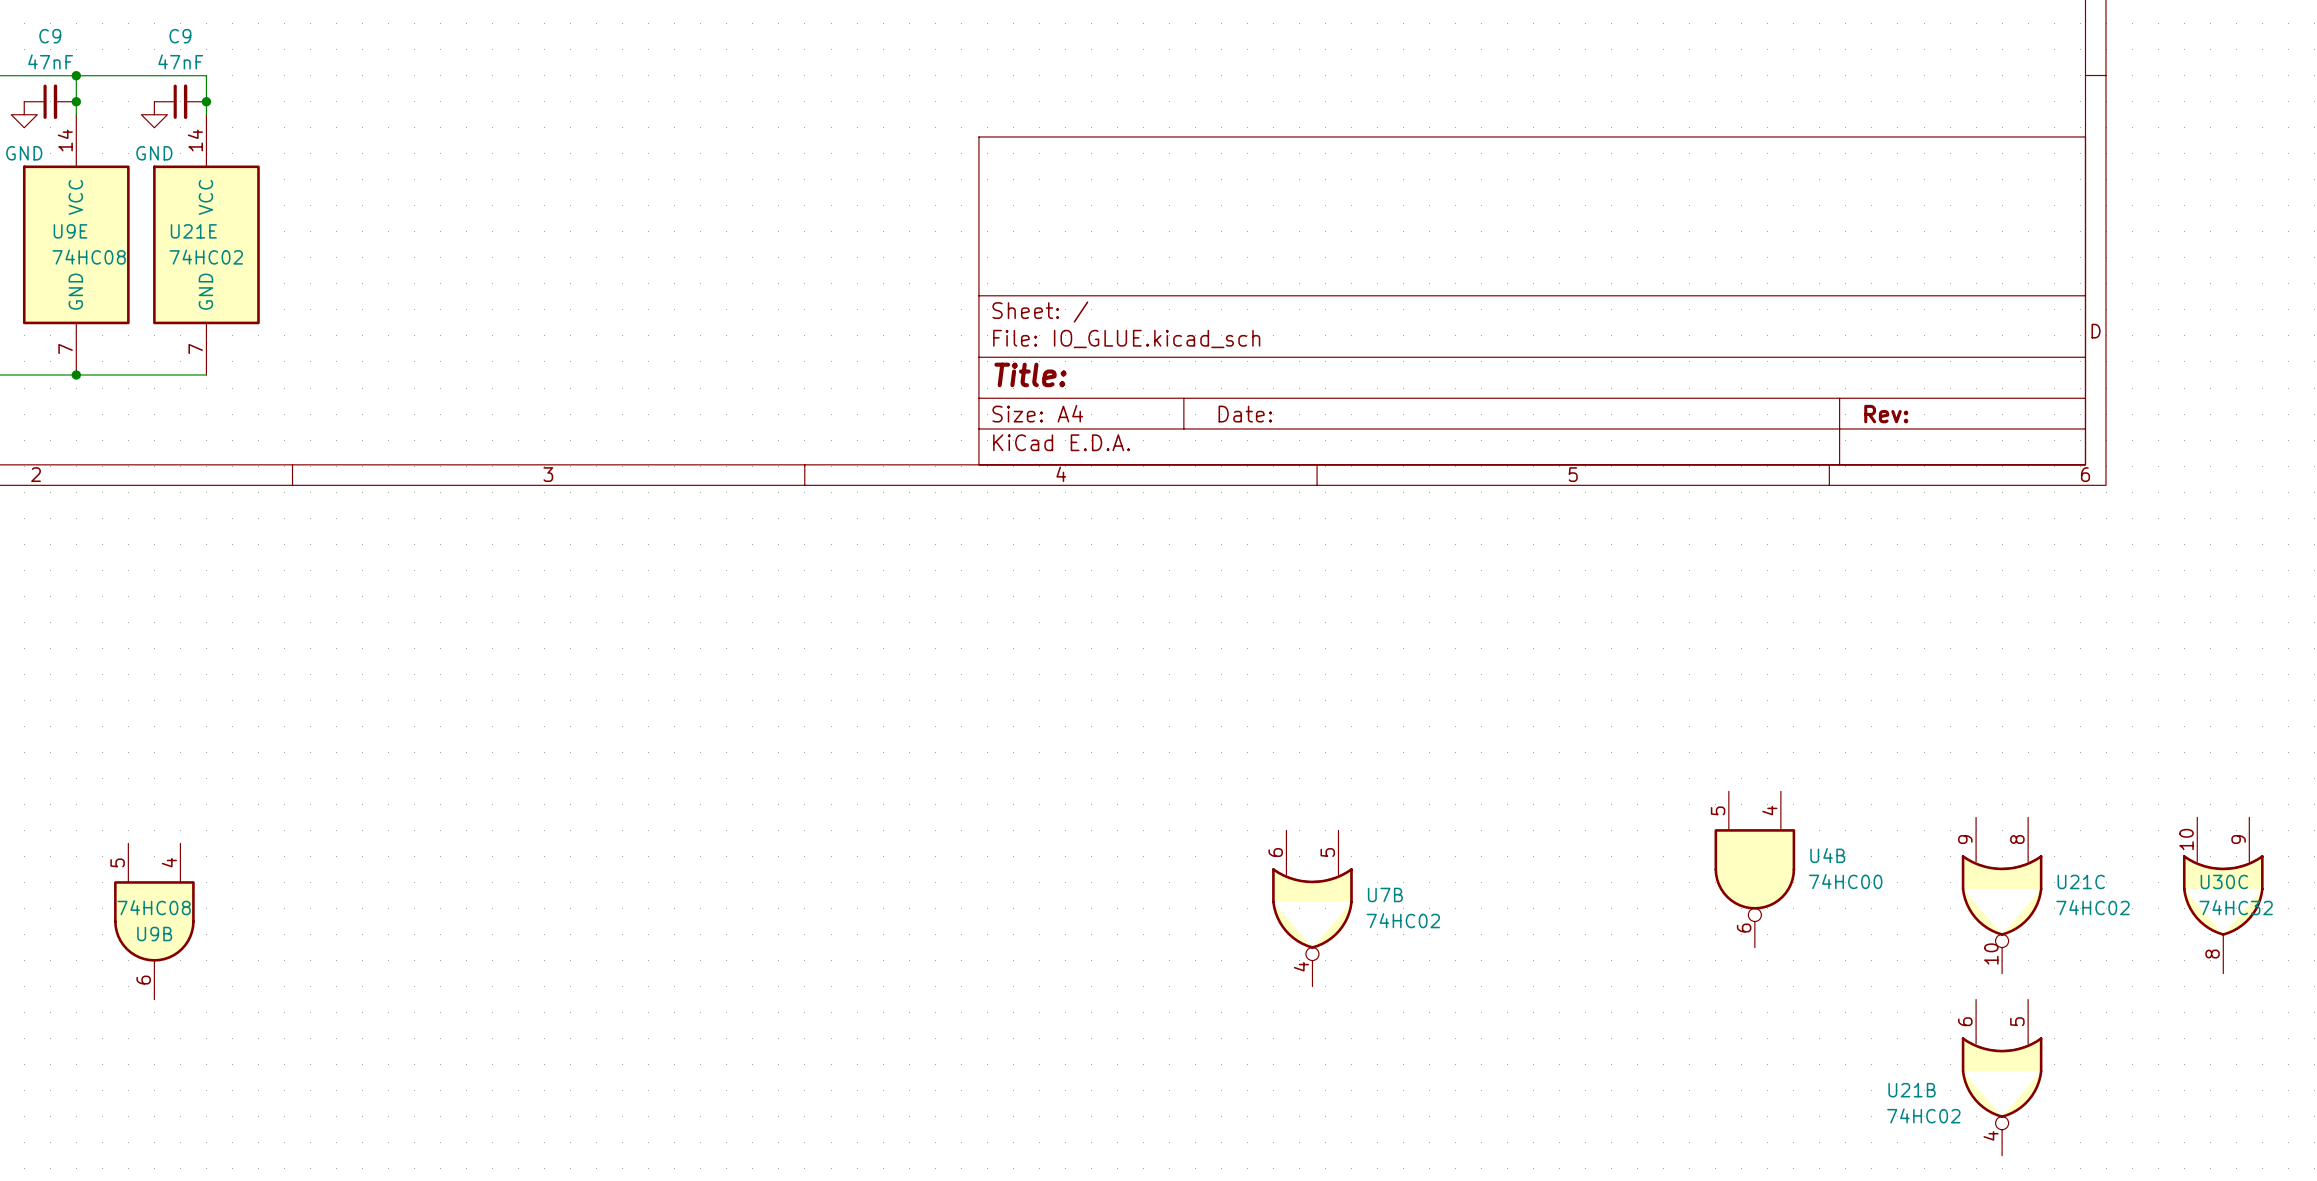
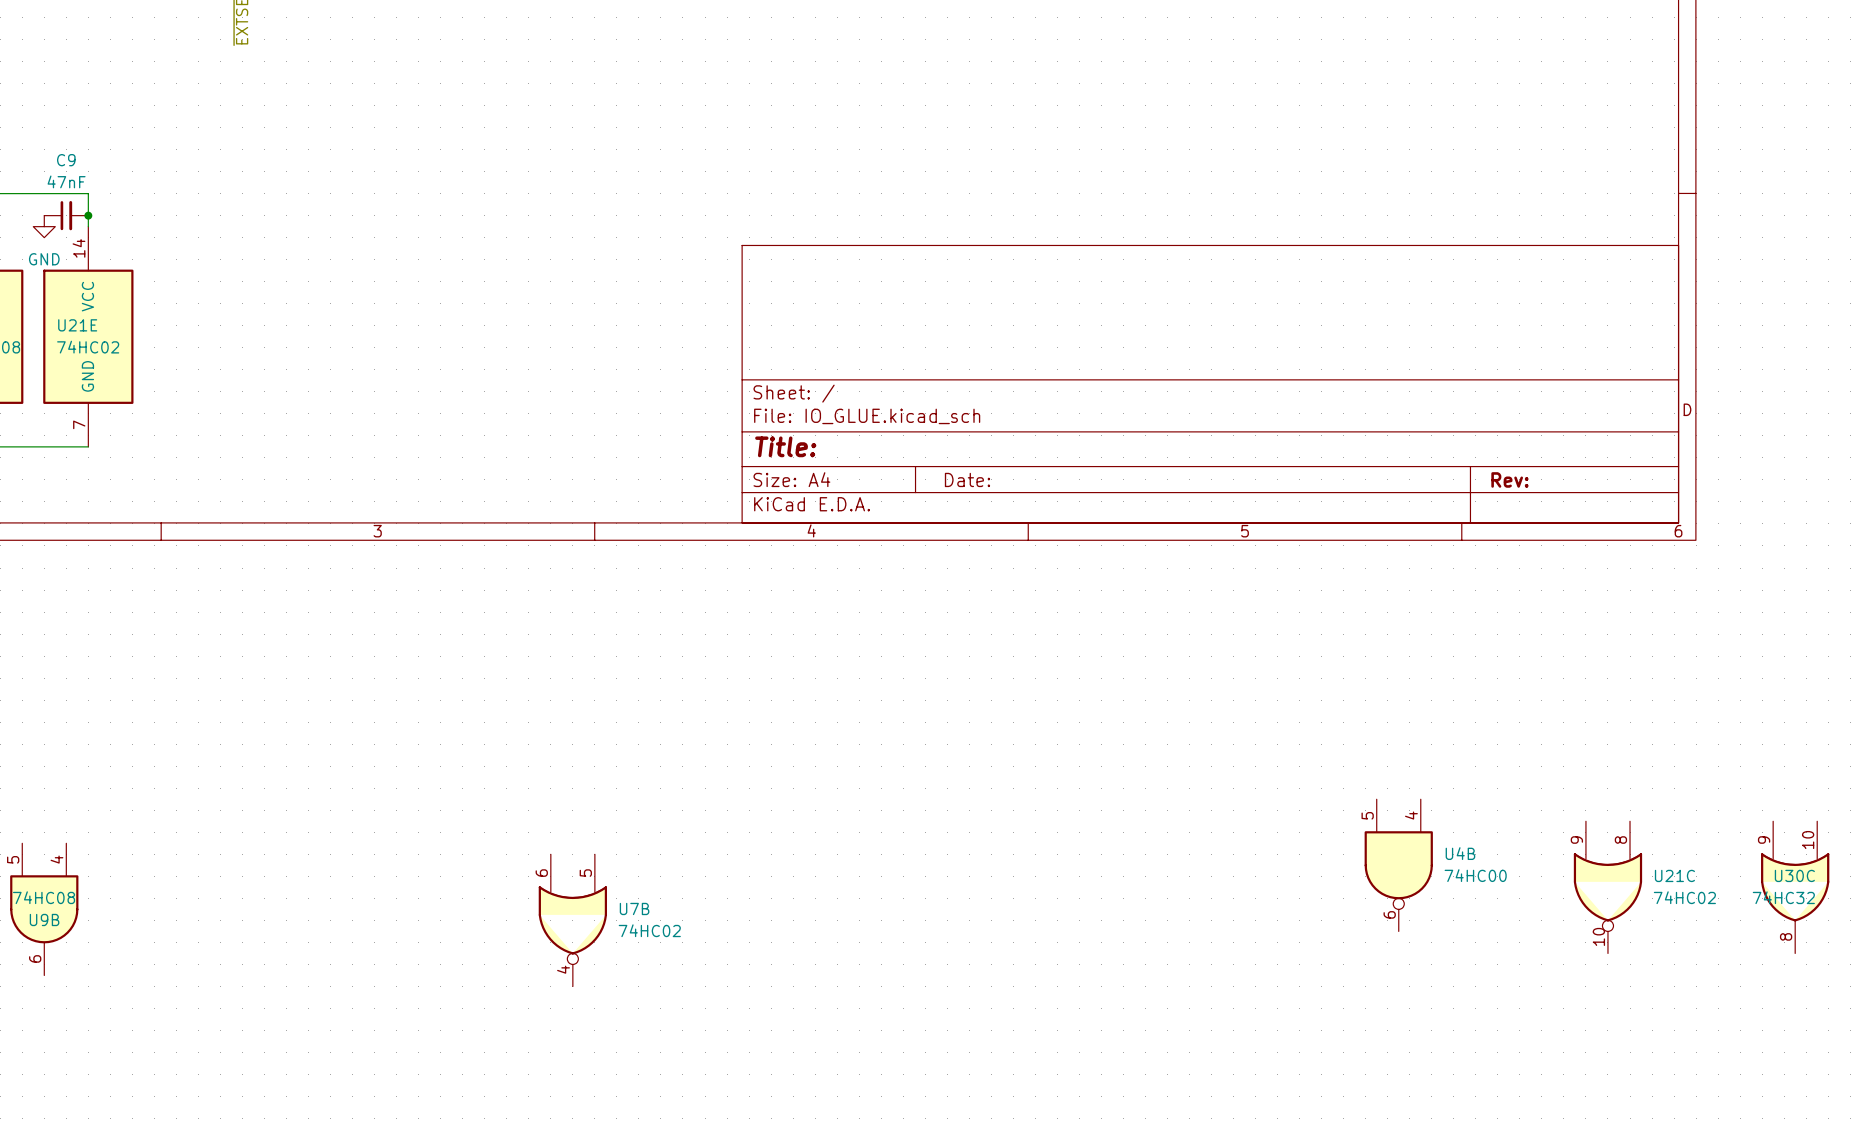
U30C flip: as is (2223, 895) -> left-right (1795, 887)
U7B position: (1312, 908) -> (572, 920)
U21B: 74HC02 (2002, 1077) -> none

